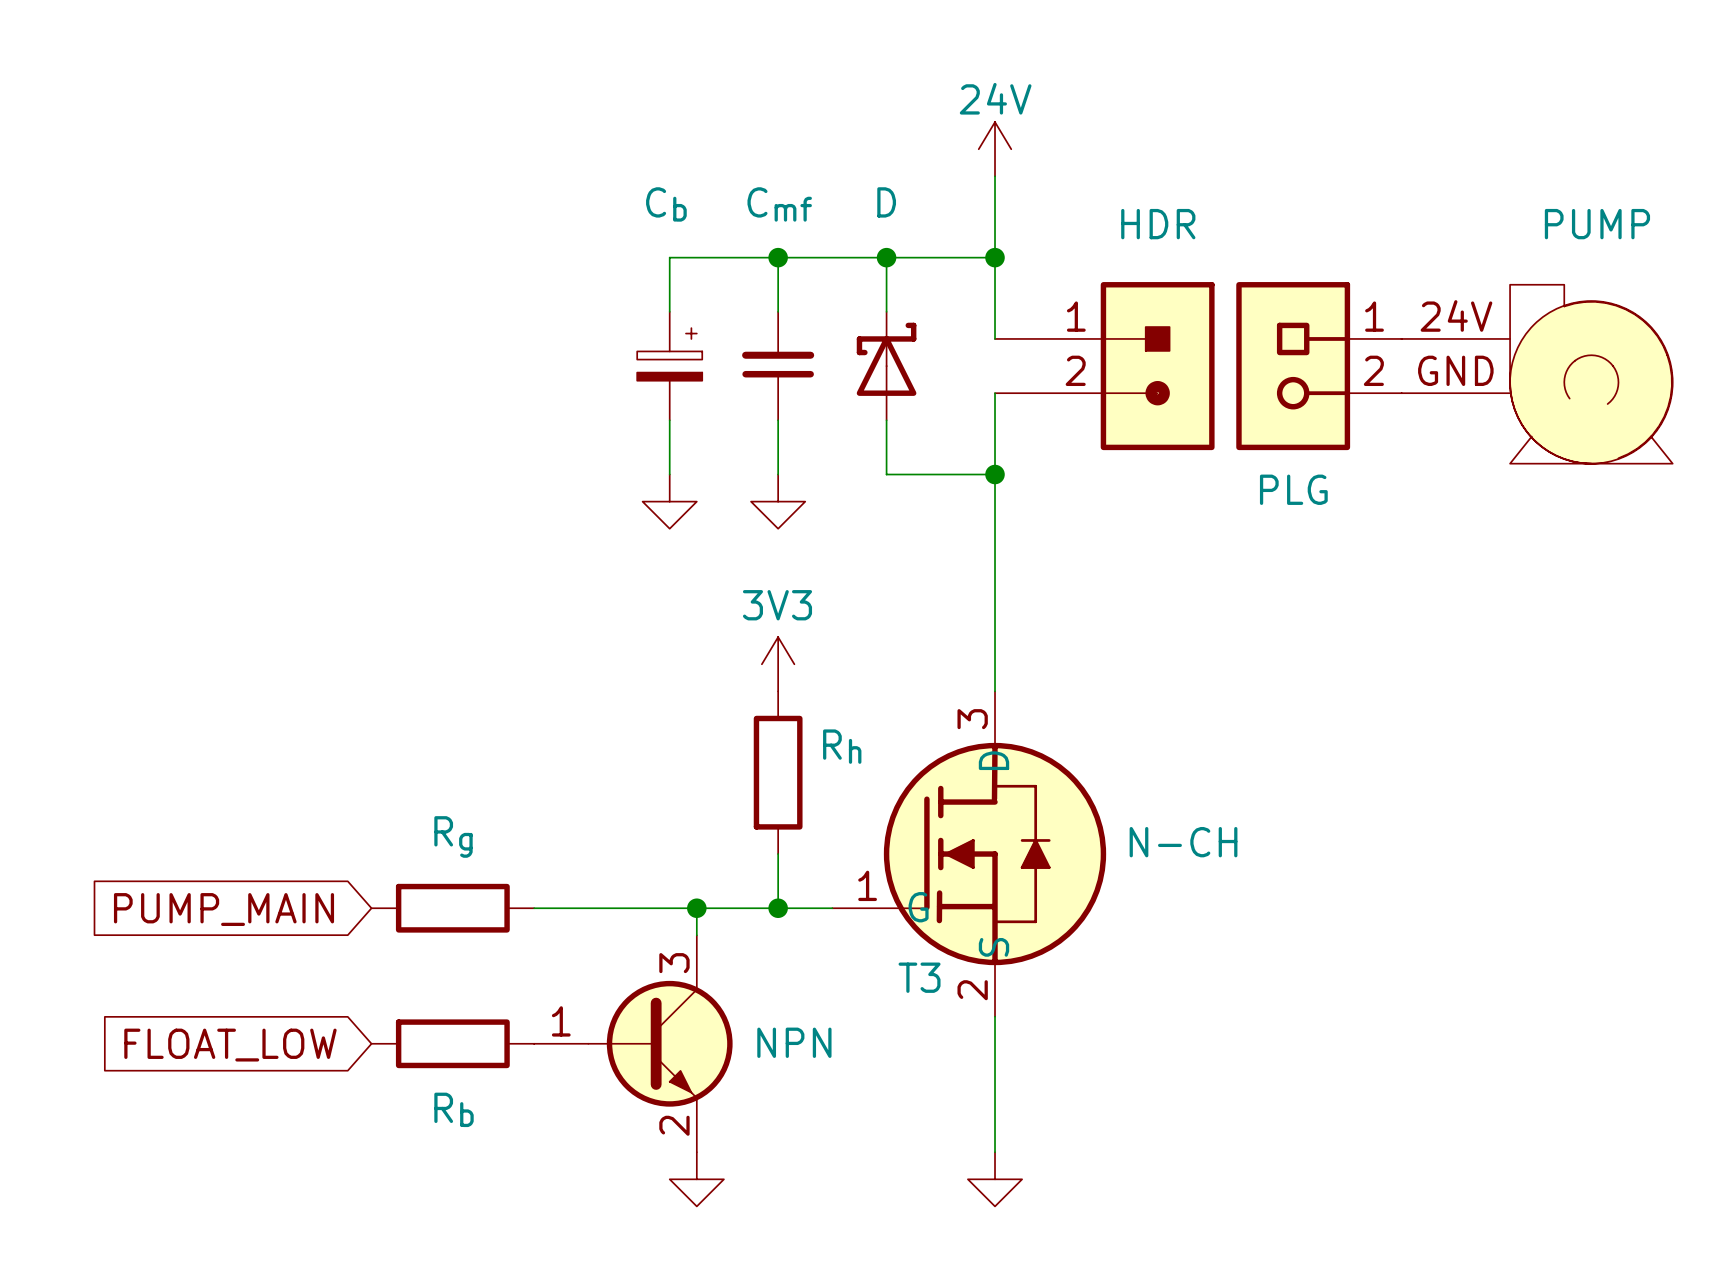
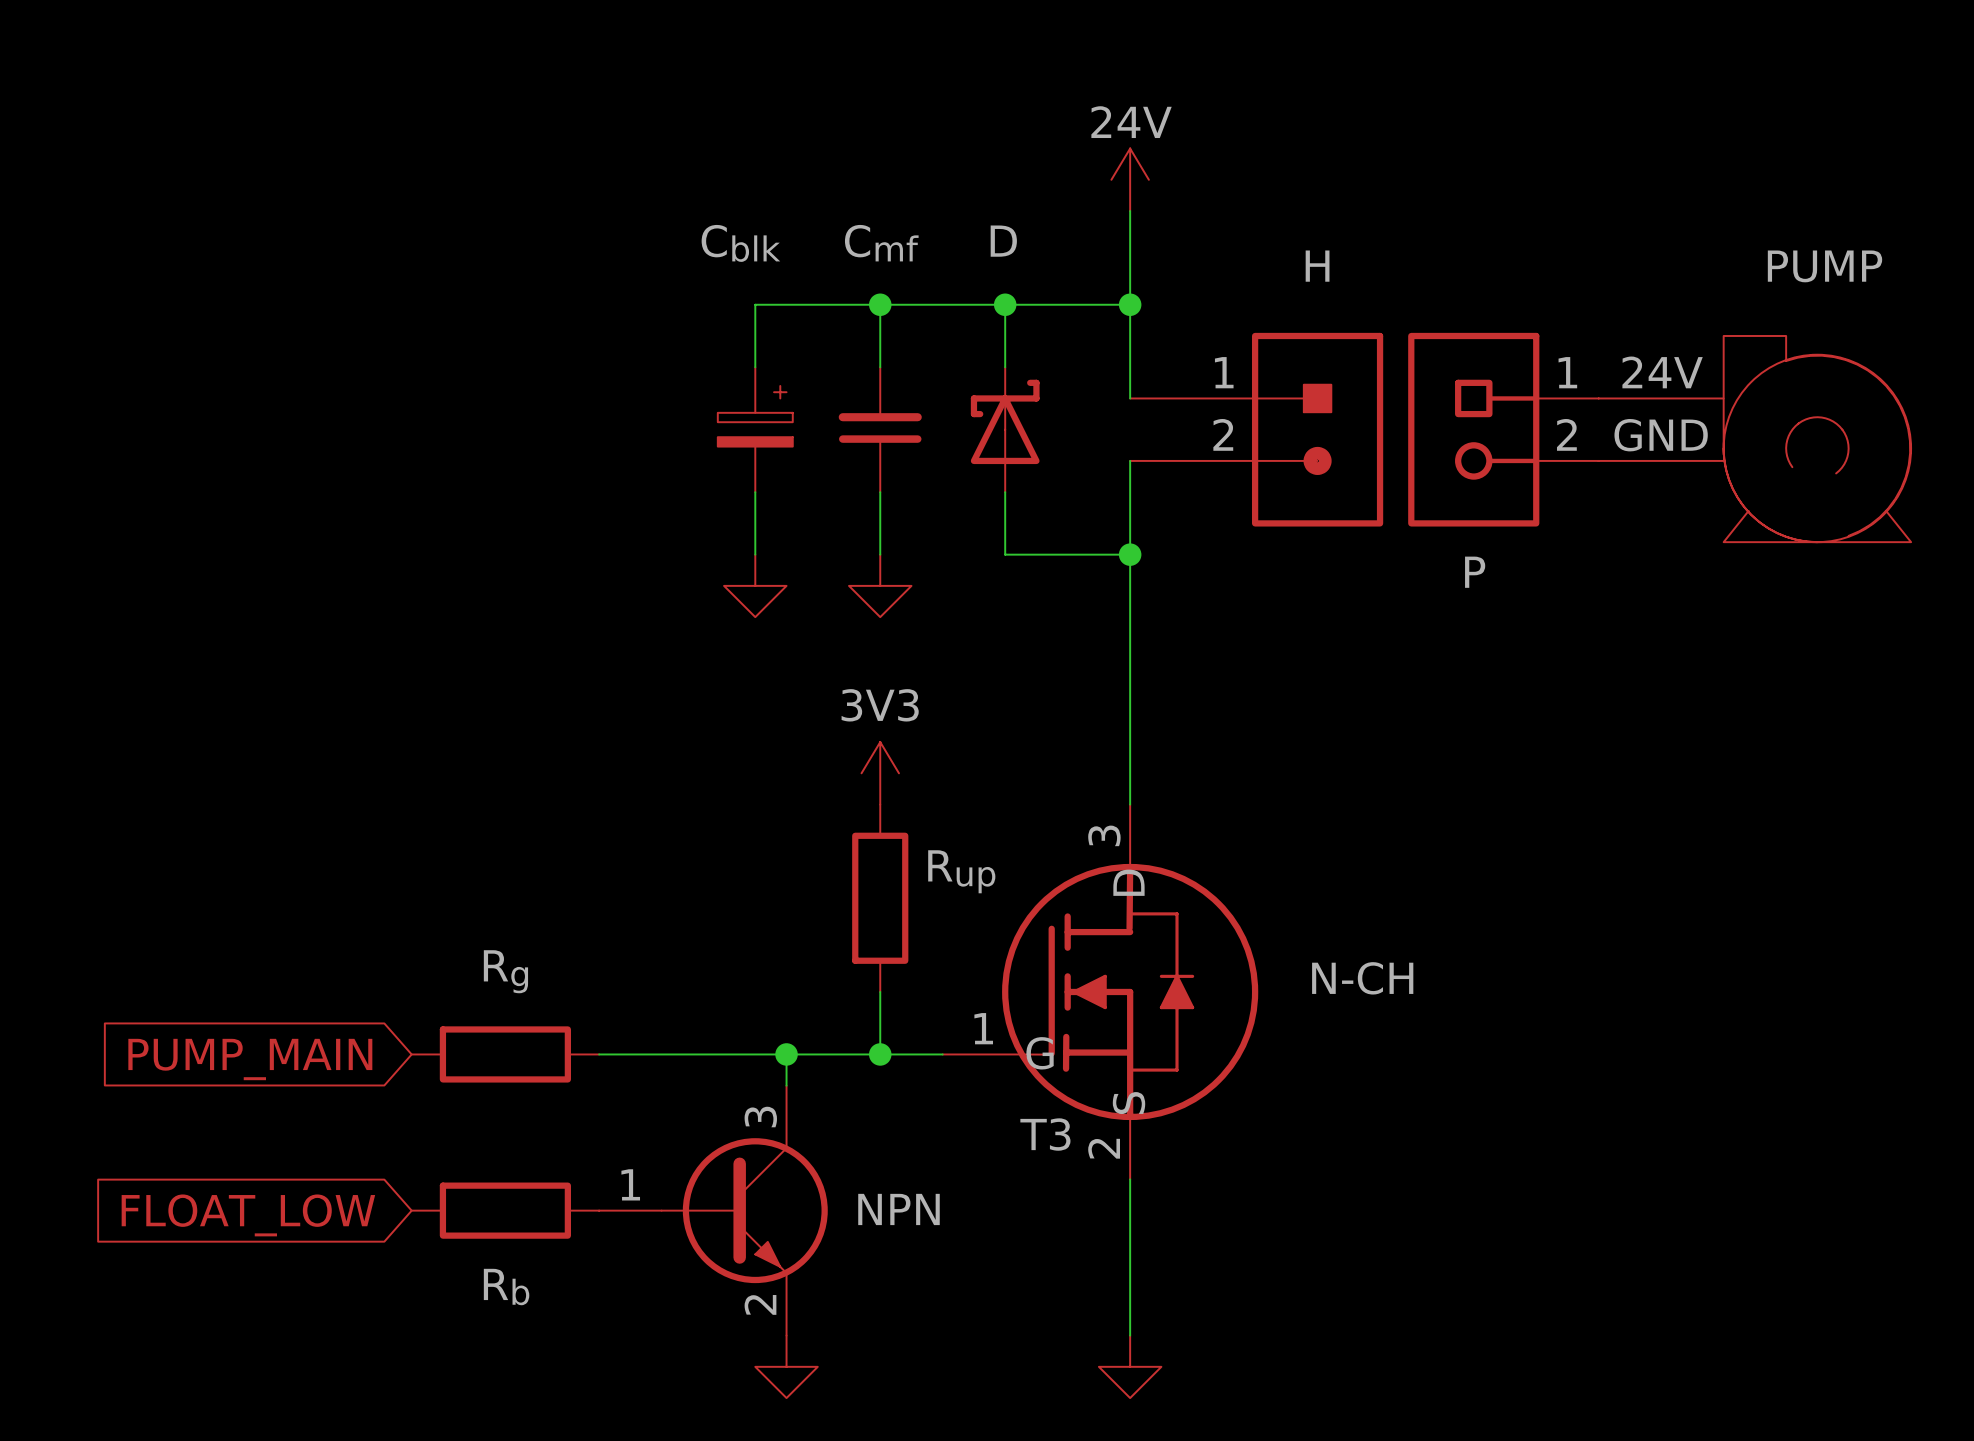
Cb name: Cb (666, 204) -> Cblk (740, 243)
HDR name: HDR (1158, 224) -> H (1317, 266)
PLG name: PLG (1293, 489) -> P (1475, 572)
Rh name: Rh (842, 746) -> Rup (961, 871)

